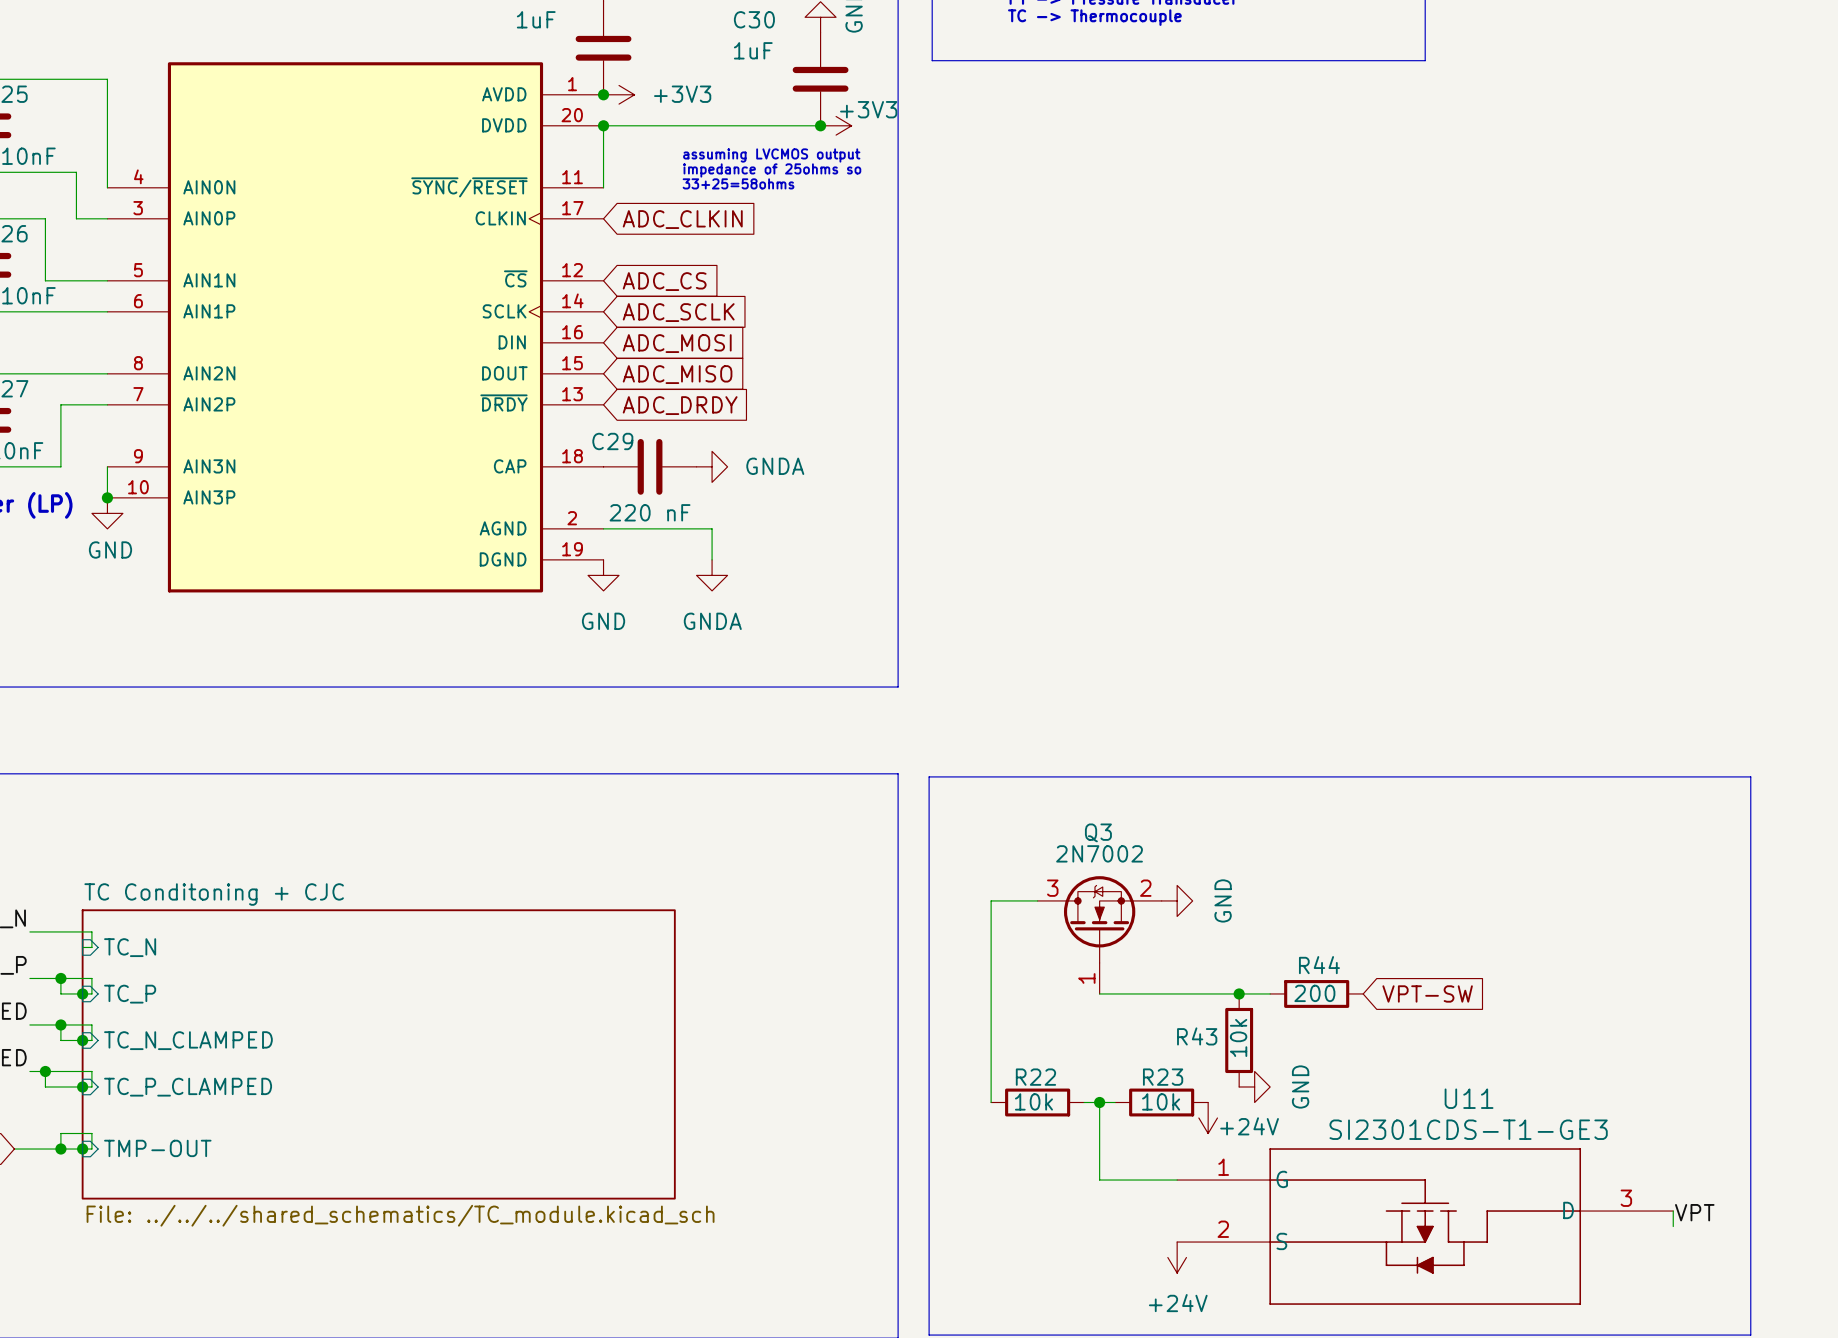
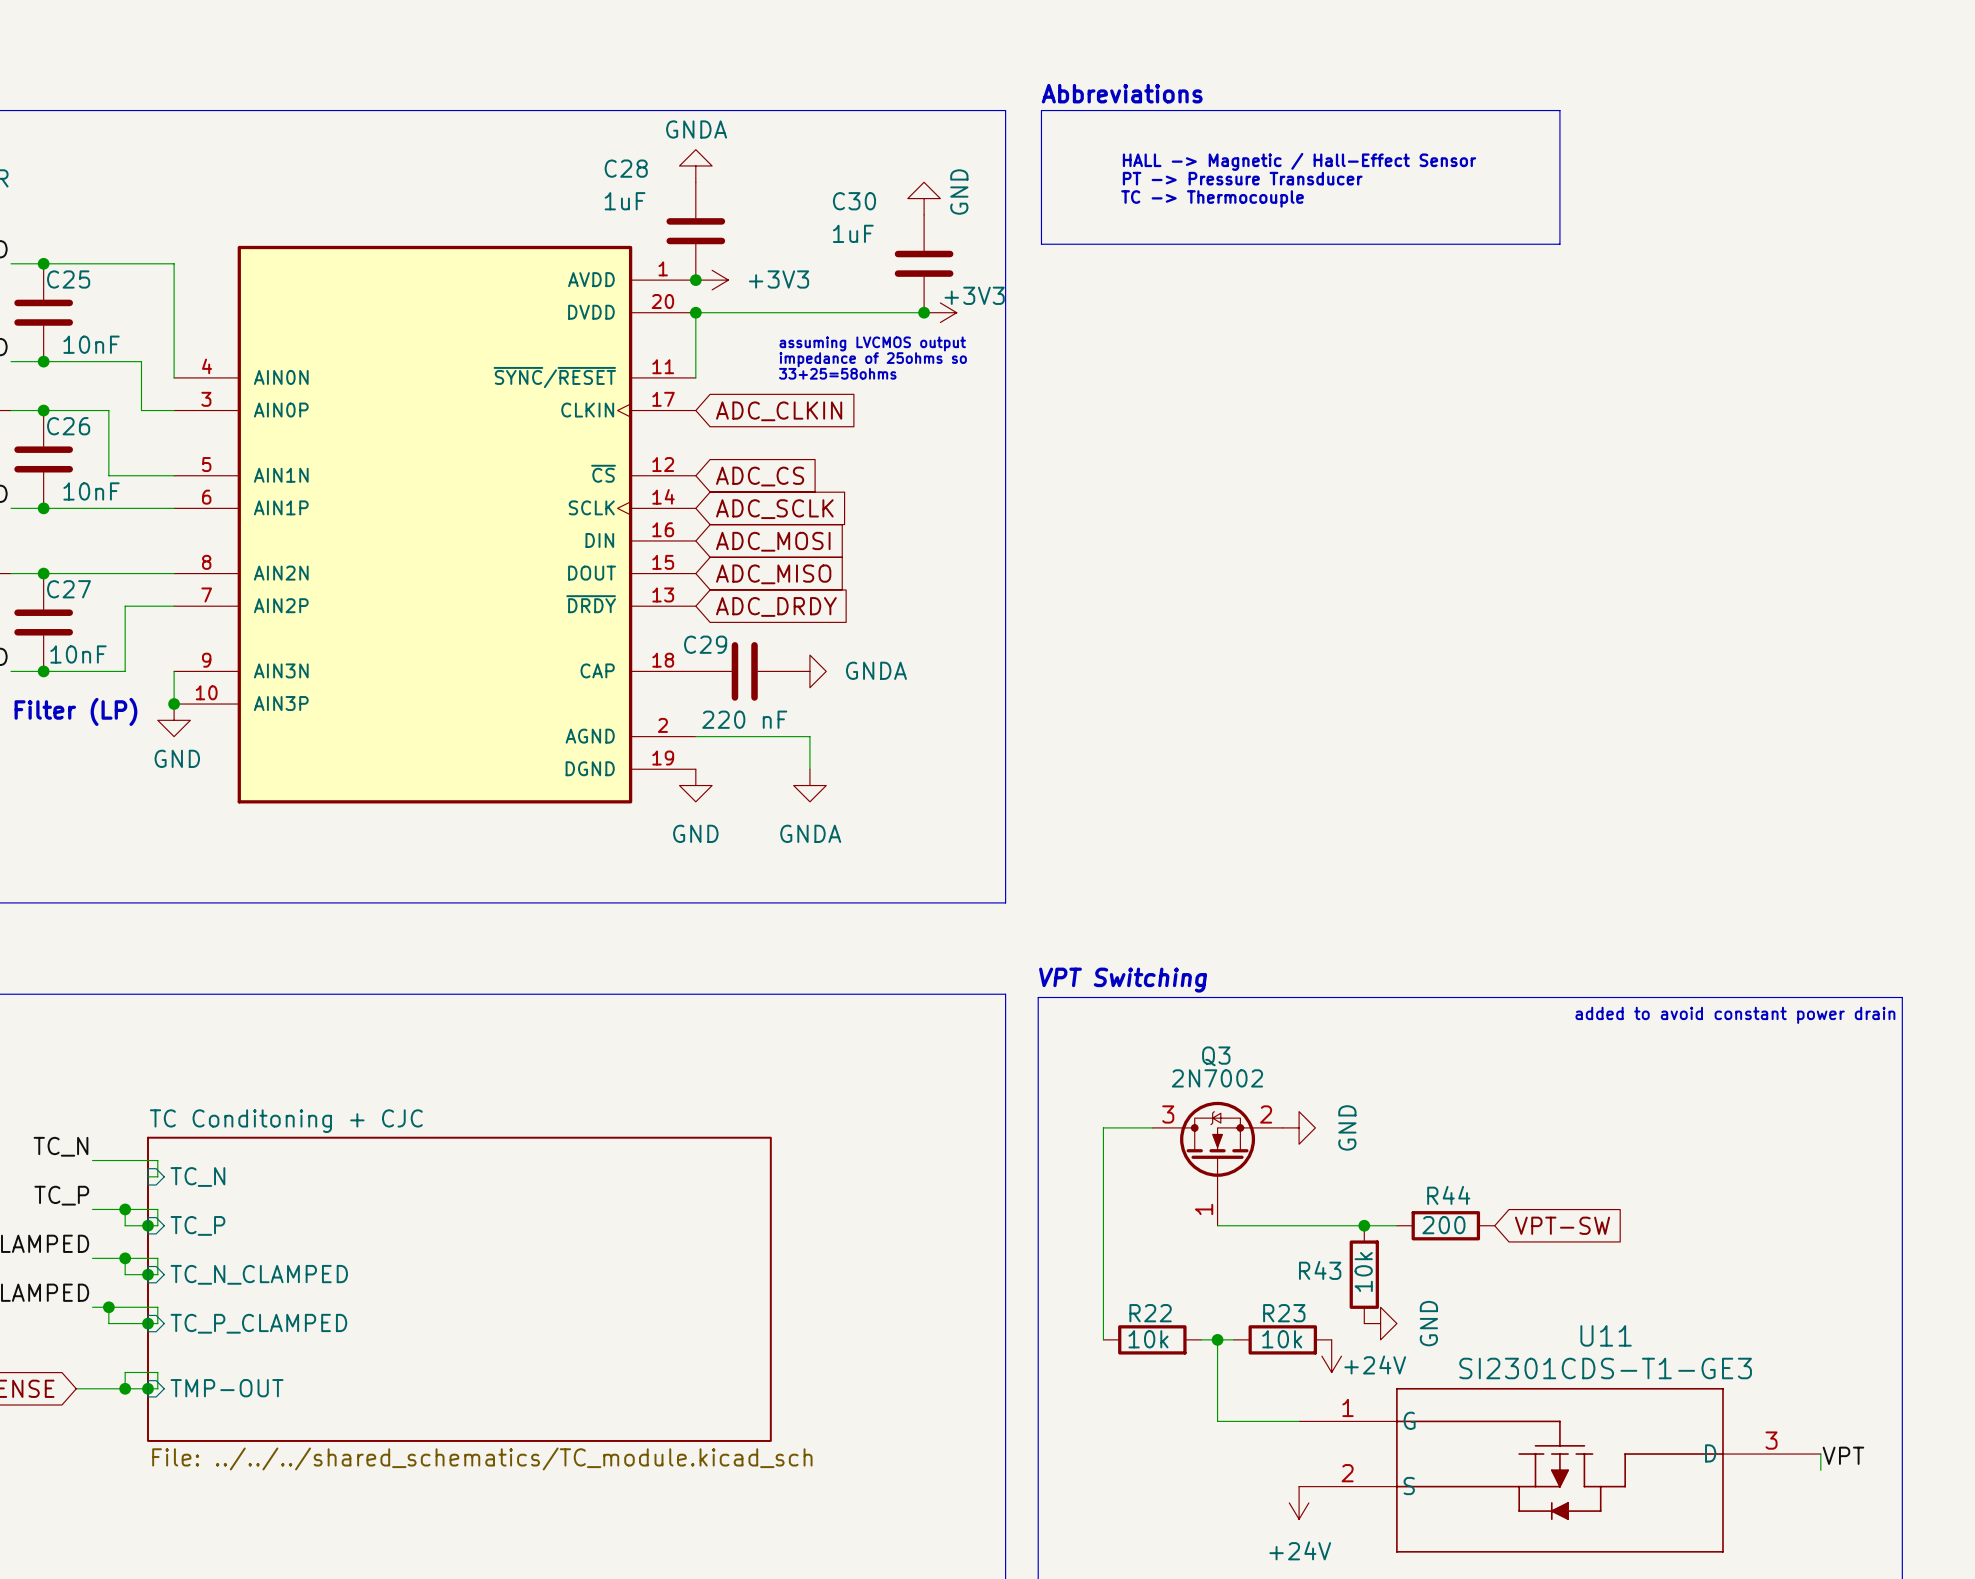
text: none -> VPT Switching (1123, 980)
text: none -> added to avoid constant power drain (1735, 1015)

